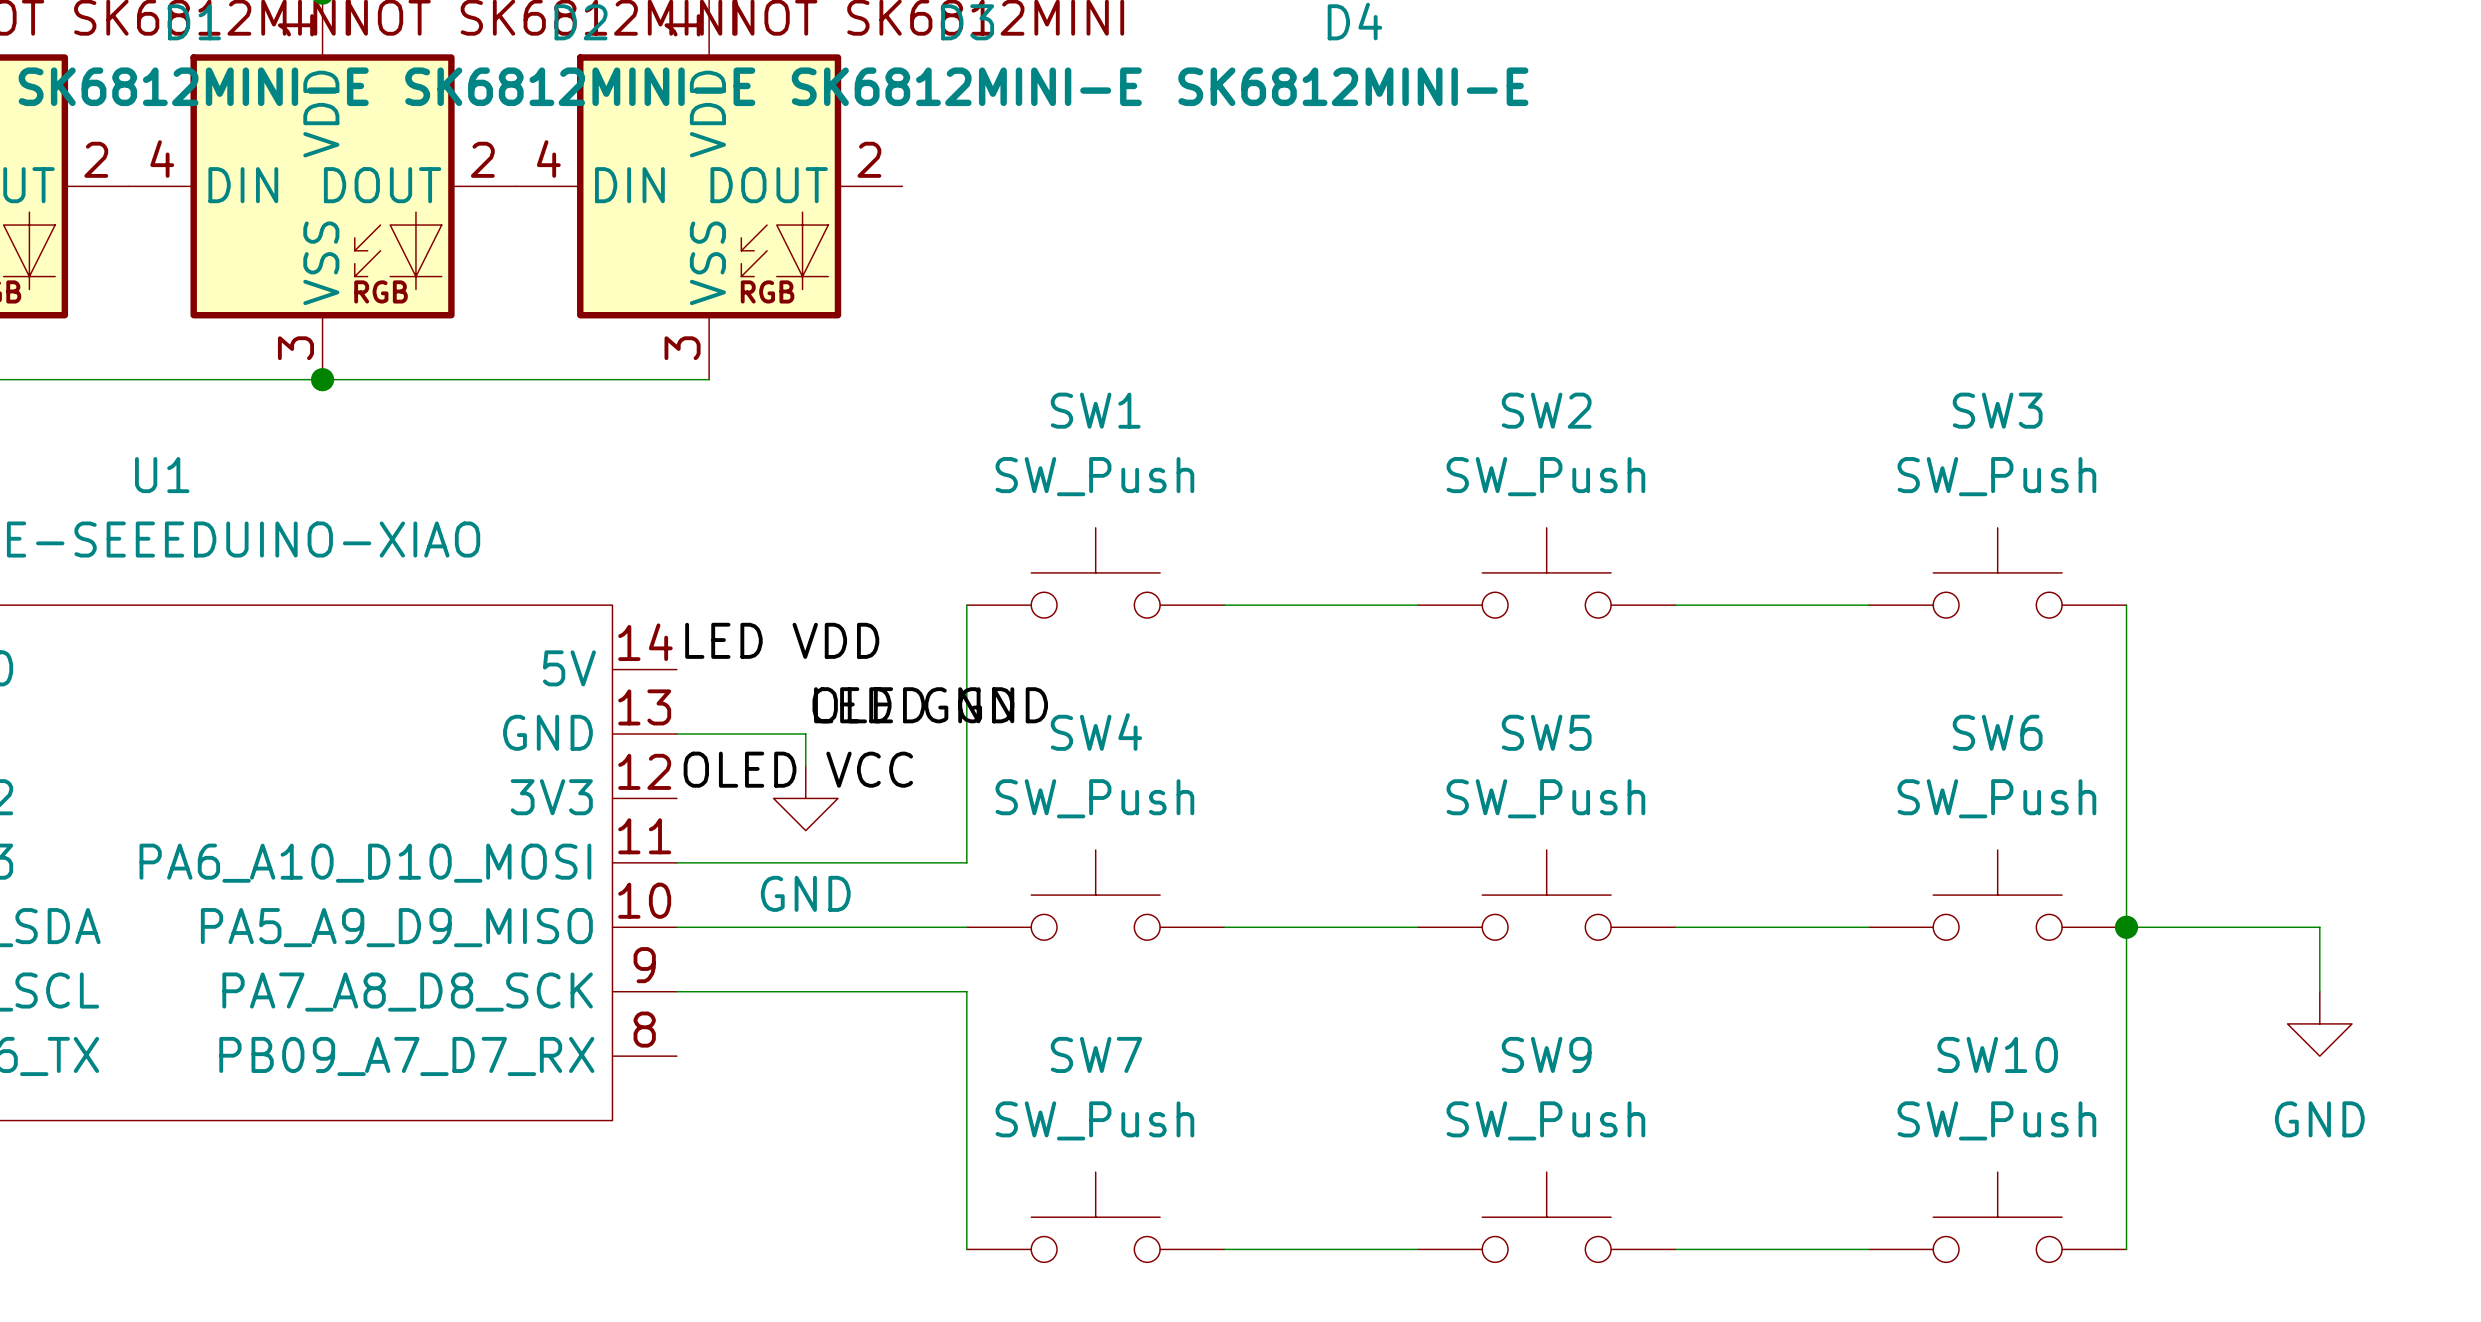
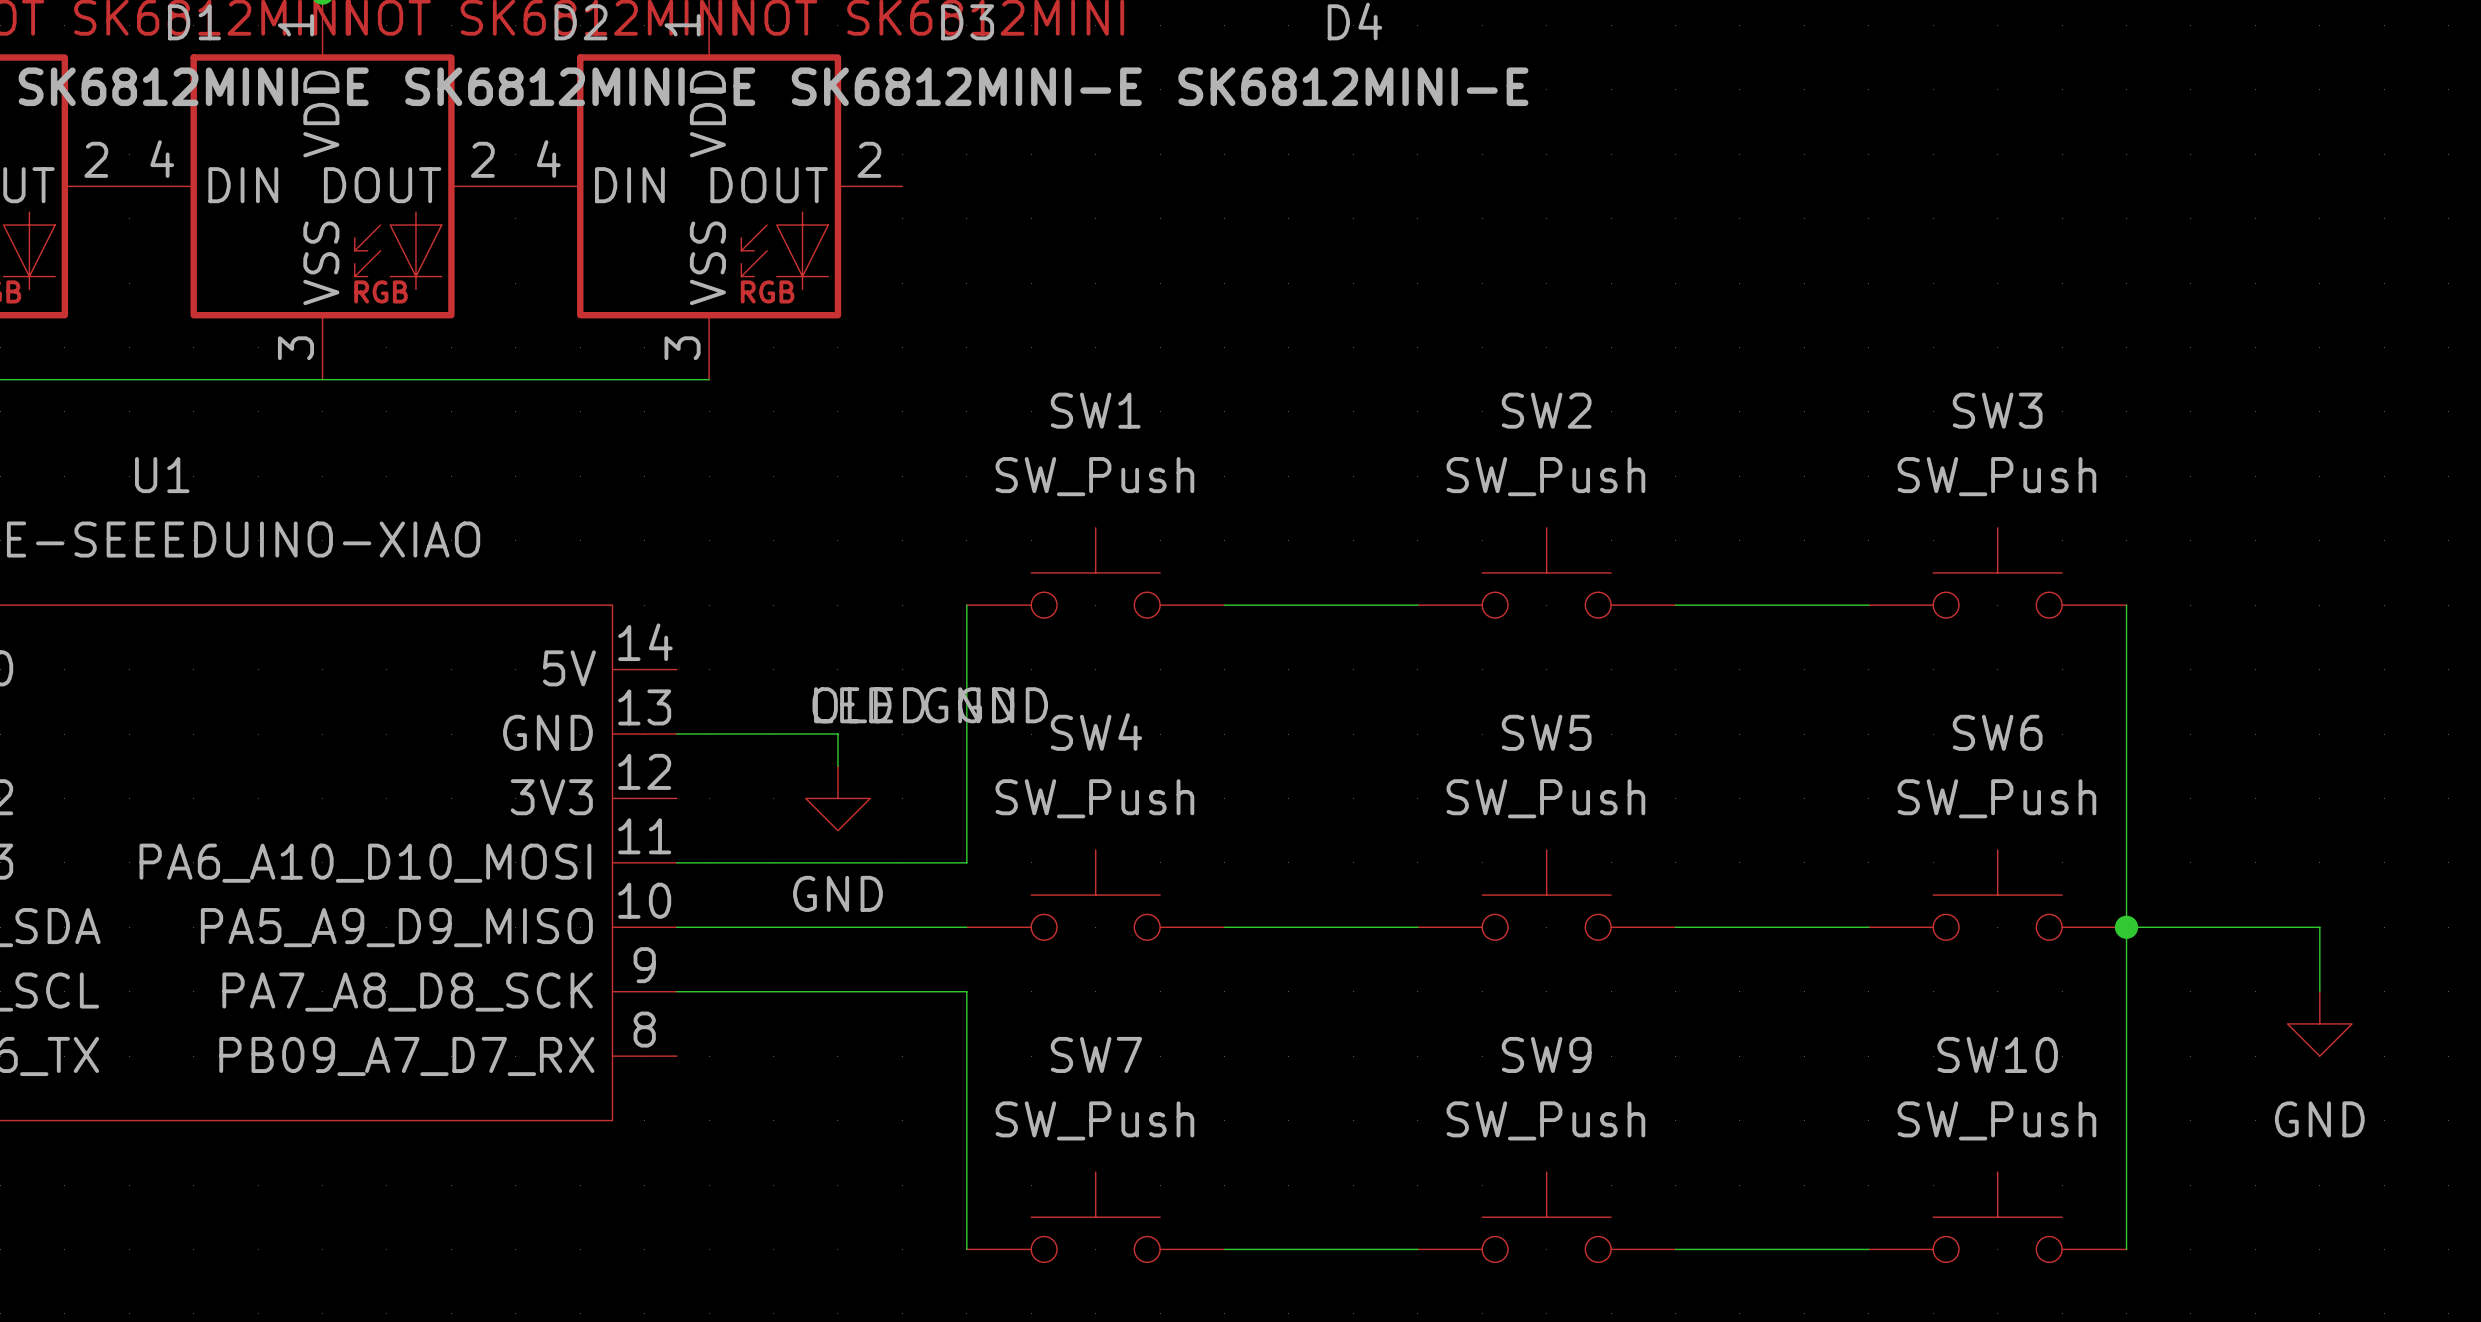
junction: (322, 379) -> none
label: LED VDD (782, 640) -> none
wire: (805, 734) (805, 766) -> (805, 734) (837, 734) (837, 766)
label: OLED VCC (798, 769) -> none
power symbol position: GND (805, 798) -> GND (837, 798)

